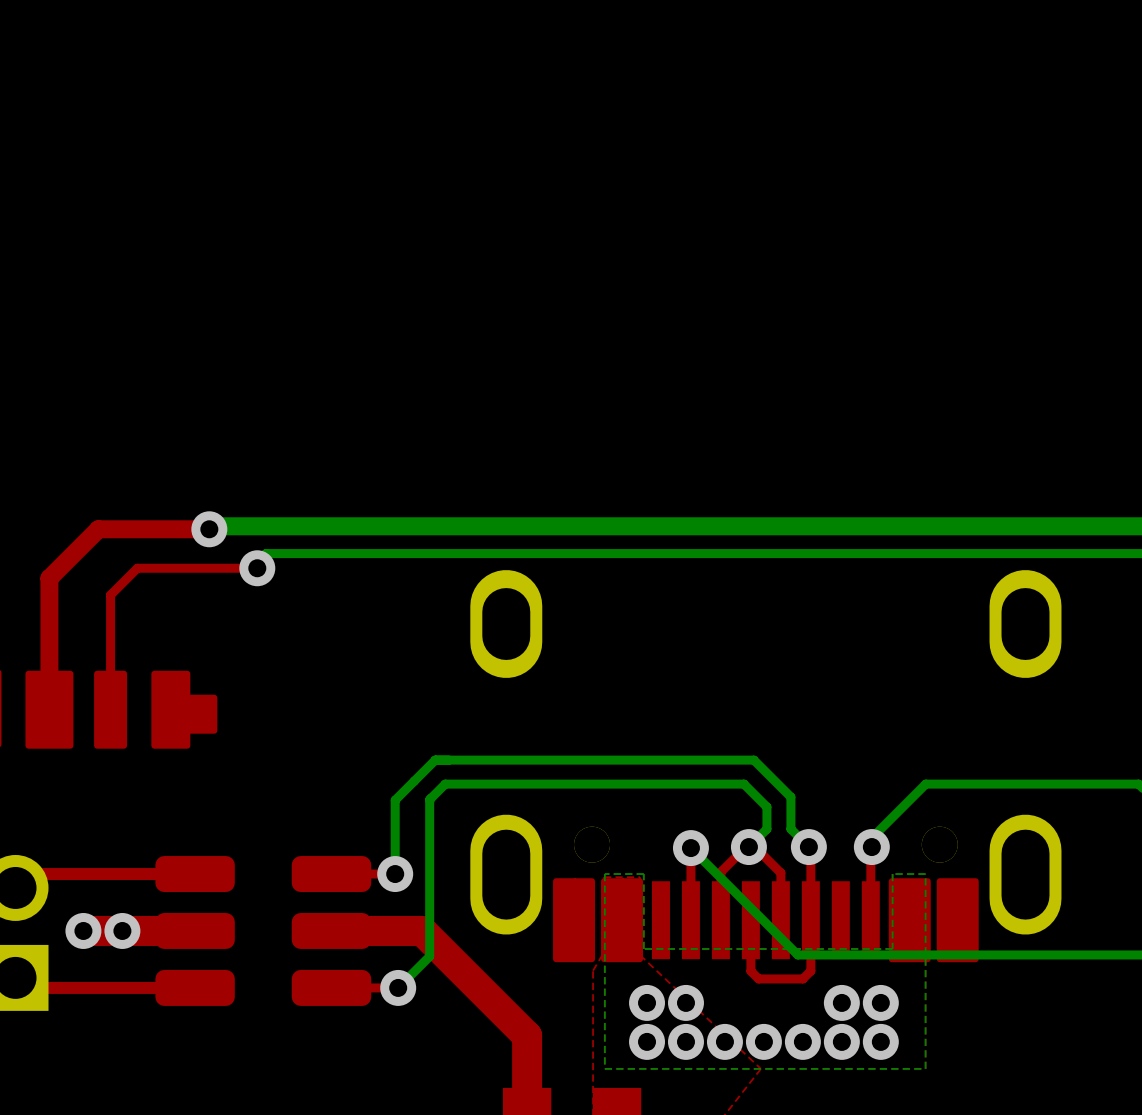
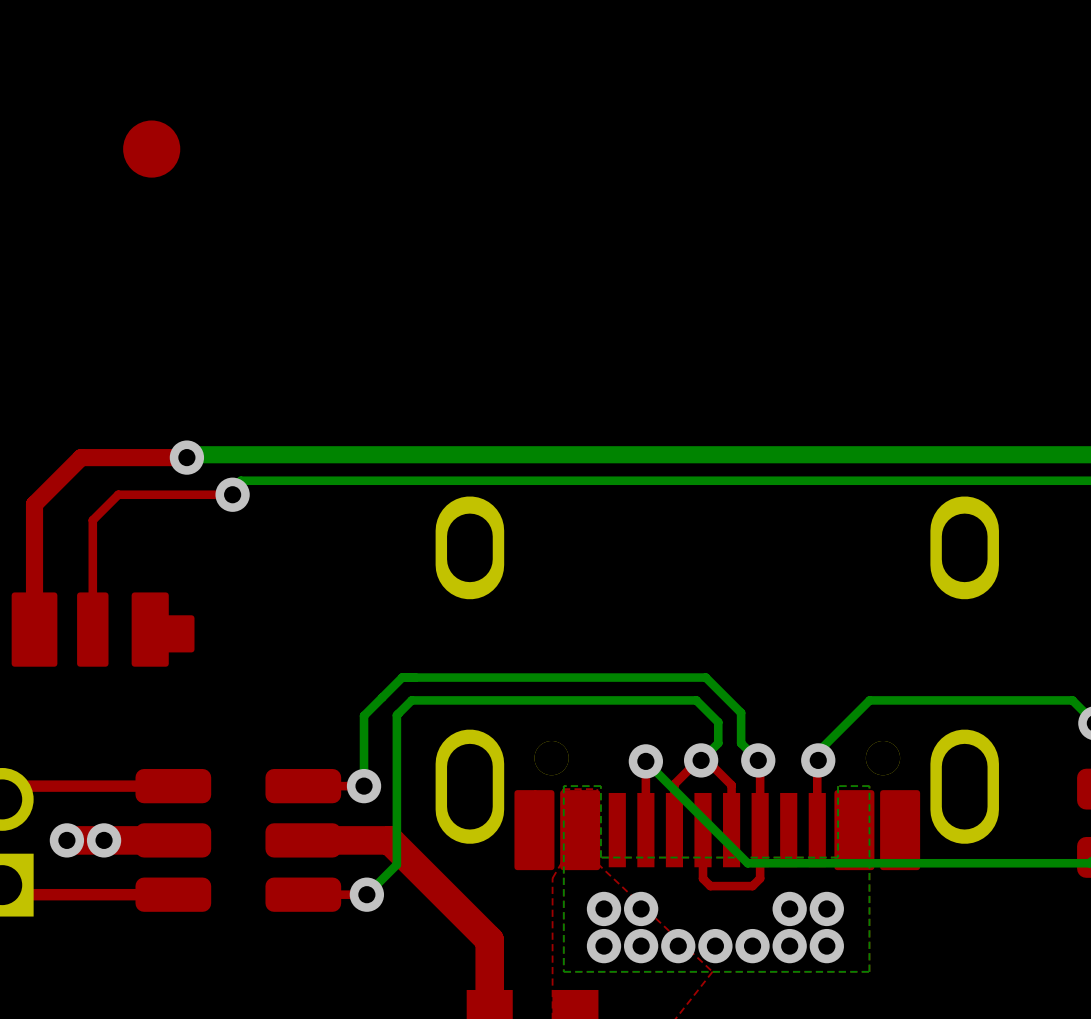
part: none -> (151, 149)

